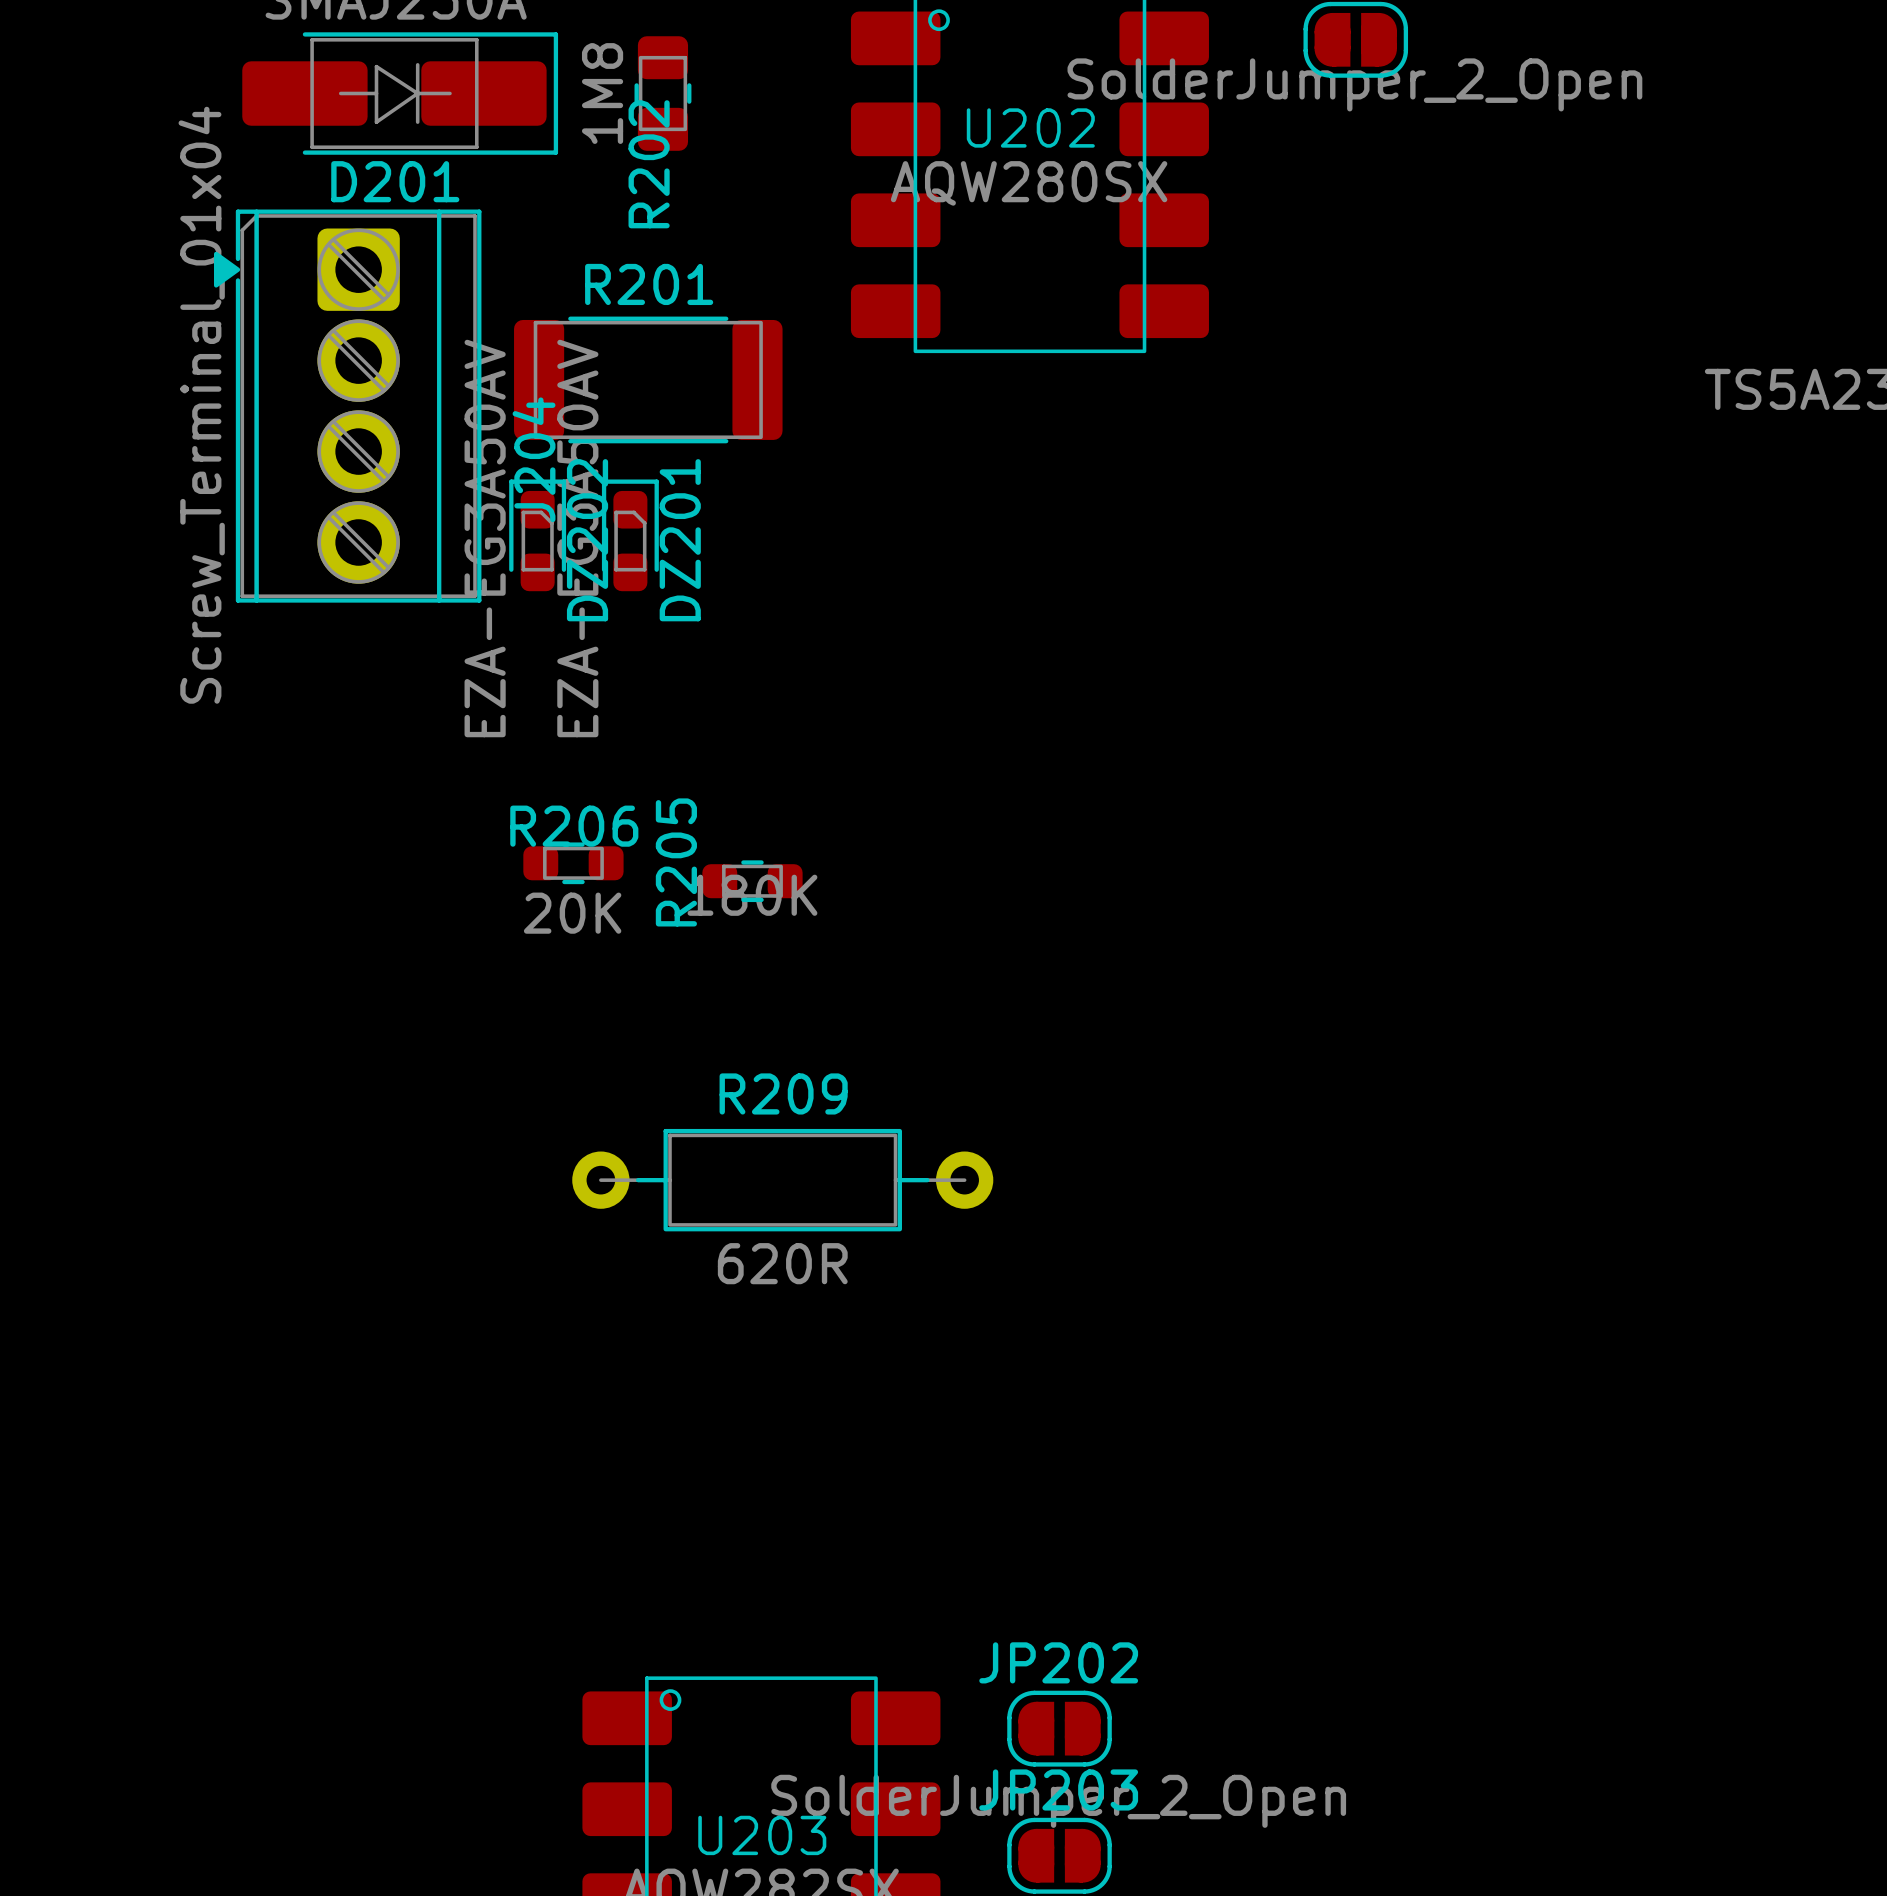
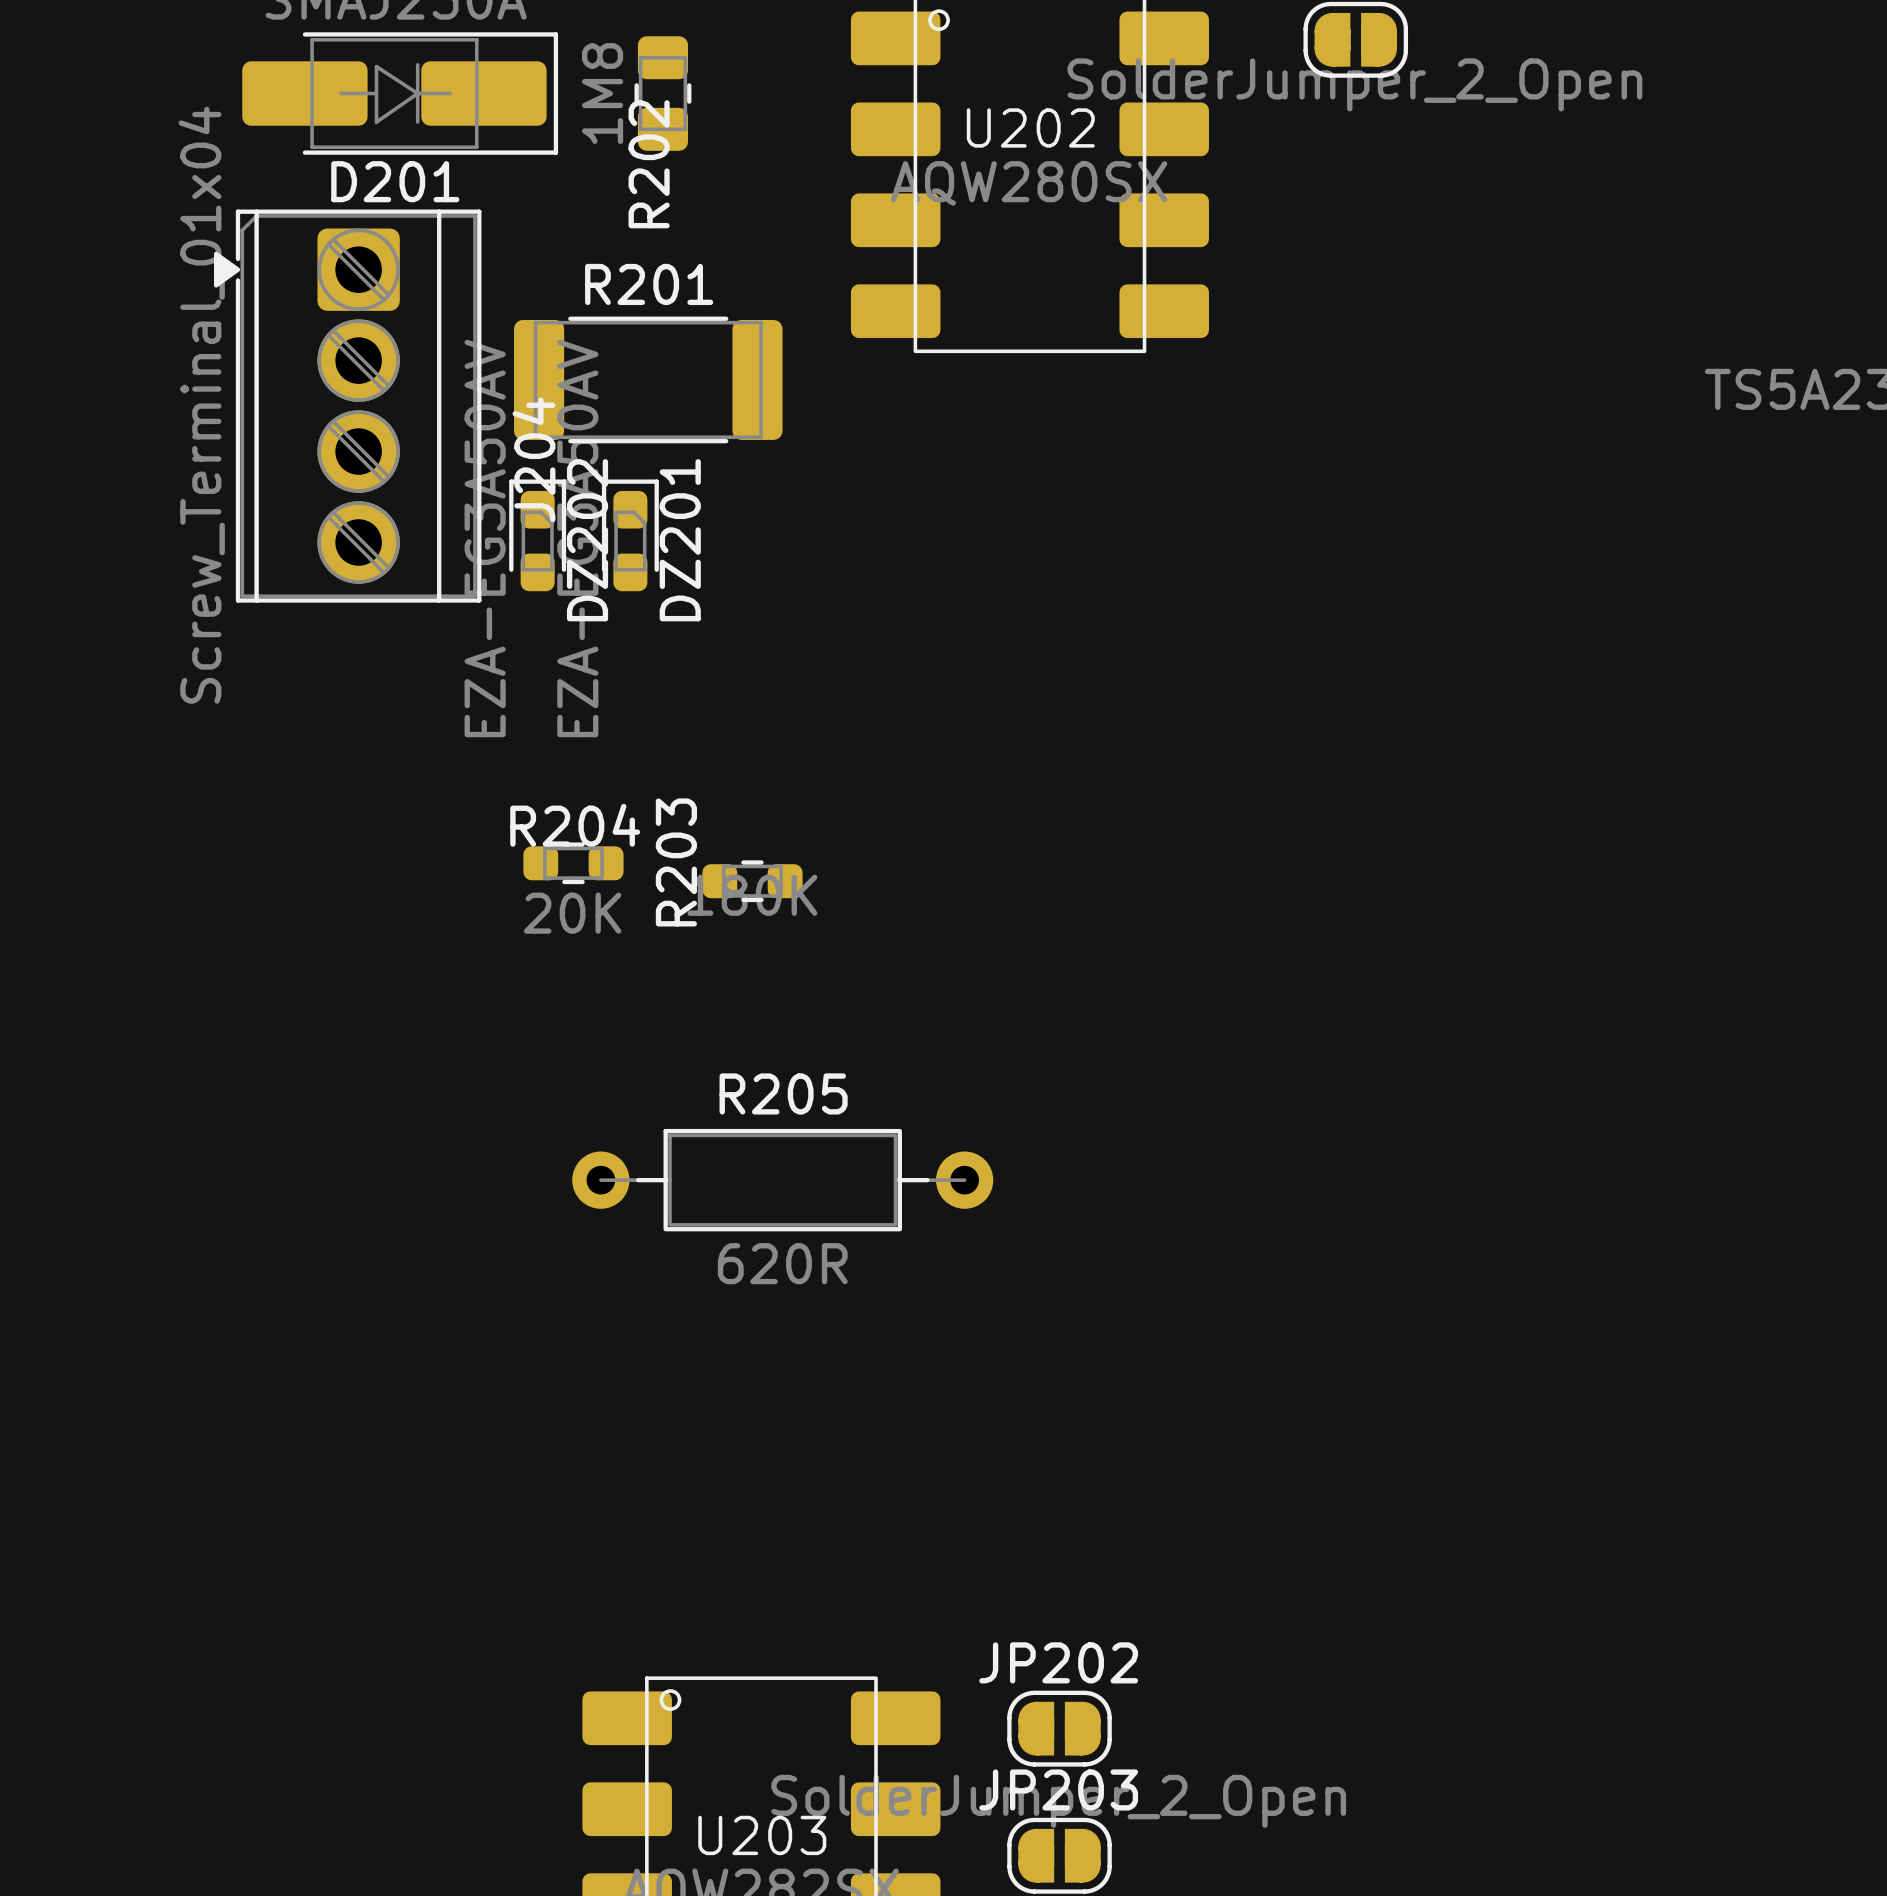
R206 name: R206 (574, 826) -> R204 (575, 825)
R205 name: R205 (676, 862) -> R203 (676, 862)
R209 name: R209 (783, 1093) -> R205 (783, 1093)

